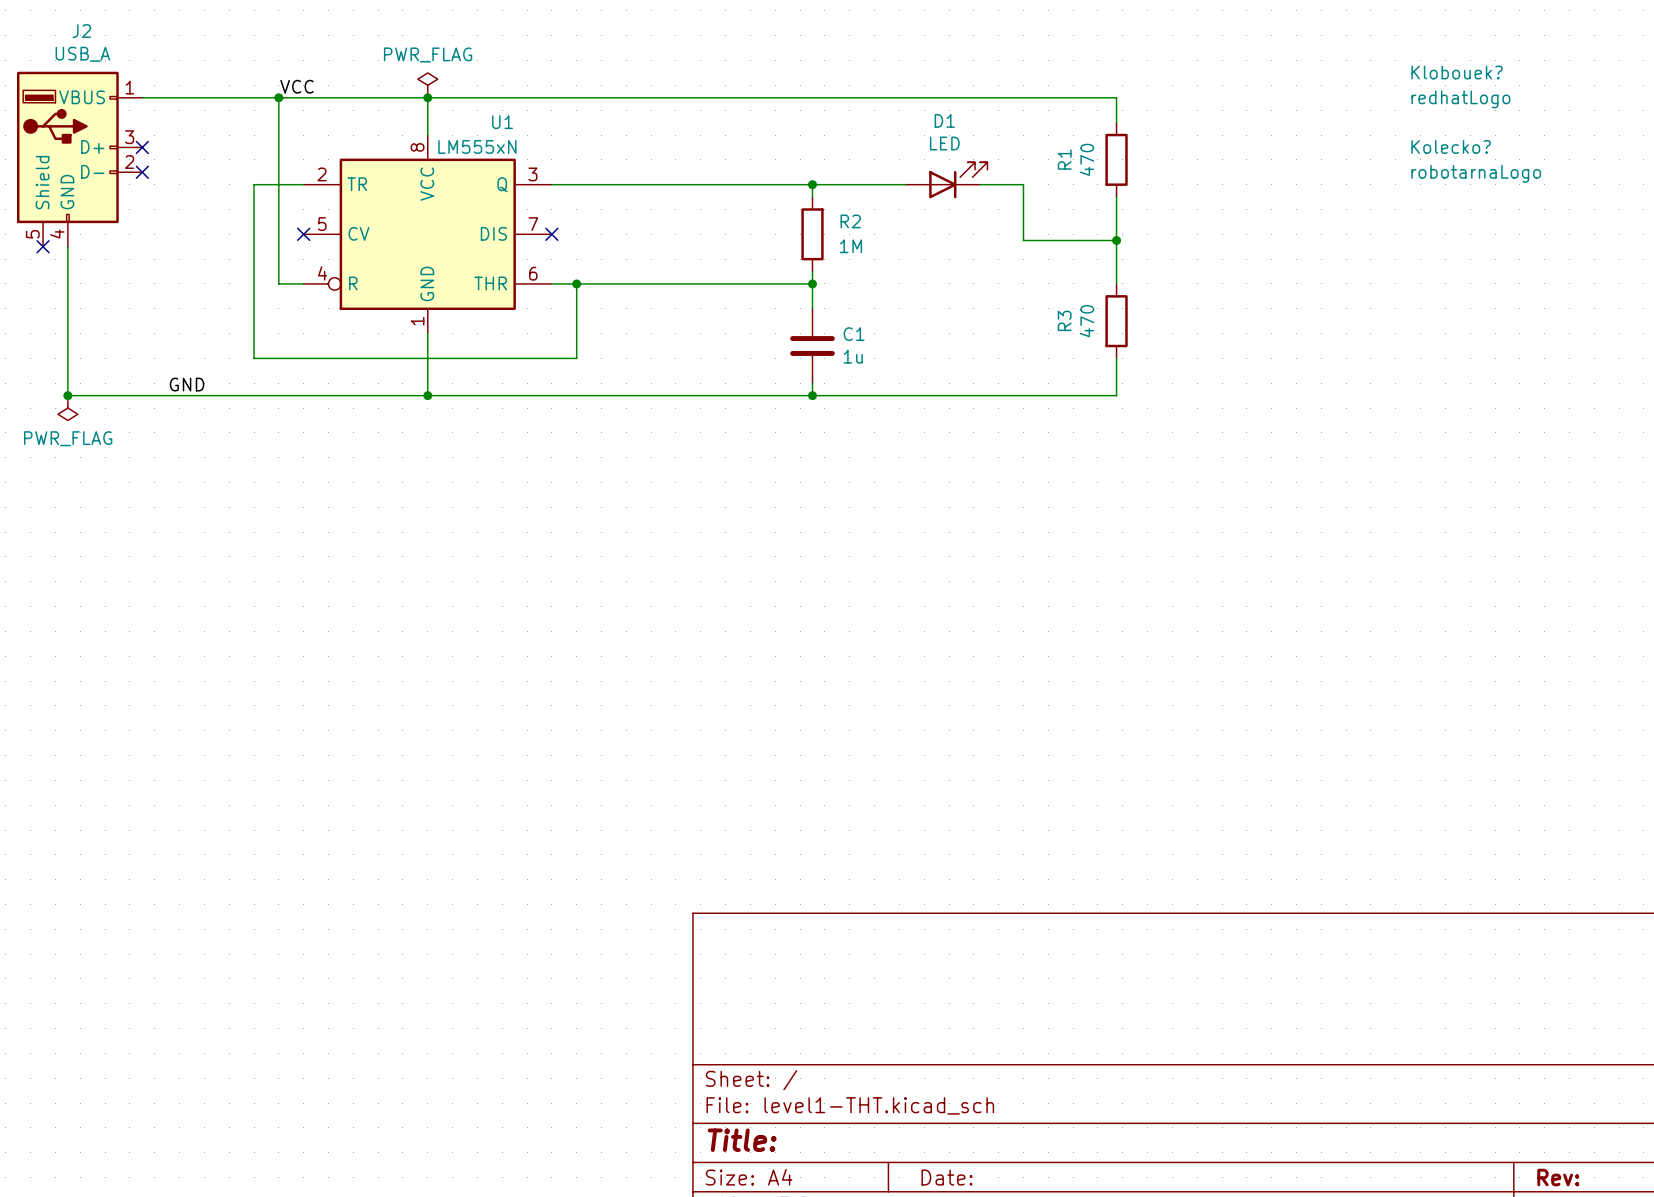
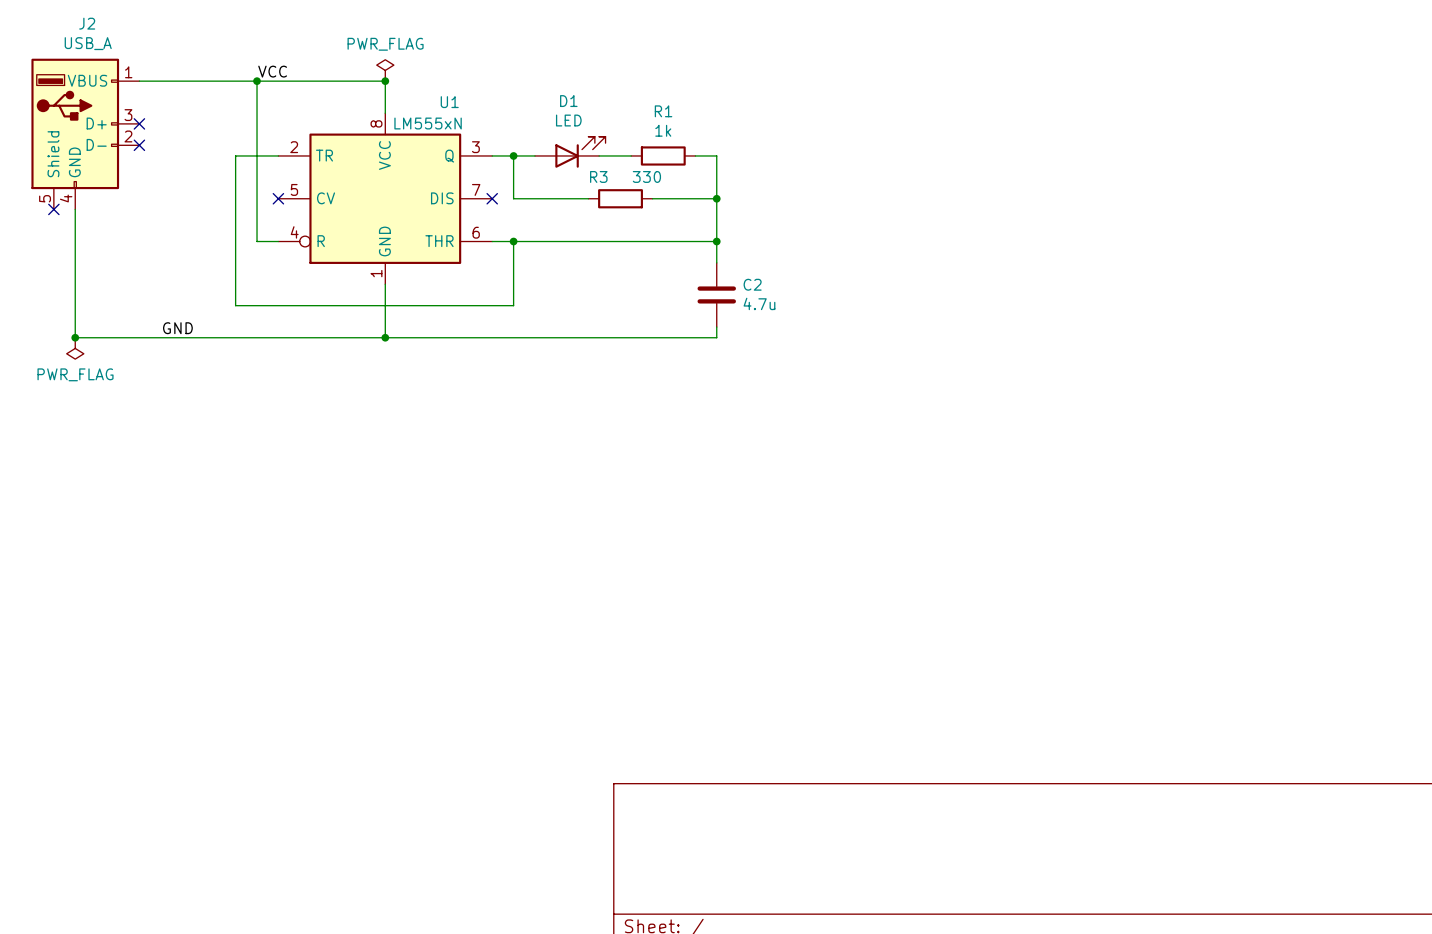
Klobouek?: redhatLogo (1460, 86) -> none
wire: (427, 97) (1116, 97) (1116, 122) -> none
R1 value: 470 (1086, 159) -> 1k (663, 130)
R1 rotation: 0° (1116, 159) -> 90° clockwise (663, 155)
R1 position: (1116, 159) -> (663, 155)
Kolecko?: robotarnaLogo (1476, 161) -> none
D1 position: (946, 180) -> (570, 152)
wire: none -> (513, 155) (513, 198) (588, 198)
junction: none -> (513, 155)
wire: (713, 184) (787, 184) -> (652, 198) (716, 198)
wire: (812, 184) (905, 184) -> none
junction position: (812, 184) -> (716, 198)
wire: (980, 184) (1023, 184) (1023, 240) (1116, 240) -> none
wire: none -> (716, 166) (716, 230)
wire: (1116, 197) (1116, 283) -> none
R2: 1M (812, 234) -> none
junction: (1116, 240) -> none
R3 name position: R3 (1064, 320) -> R3 (598, 176)
R3 value: 470 (1086, 321) -> 330 (646, 176)
R3 rotation: 0° (1116, 321) -> 90° clockwise (620, 198)
R3 position: (1116, 321) -> (620, 198)
C1 name: C1 (854, 334) -> C2 (752, 284)
C1 value: 1u (853, 356) -> 4.7u (759, 303)
wire: (1116, 358) (1116, 395) (812, 395) -> none
junction: (812, 395) -> none

